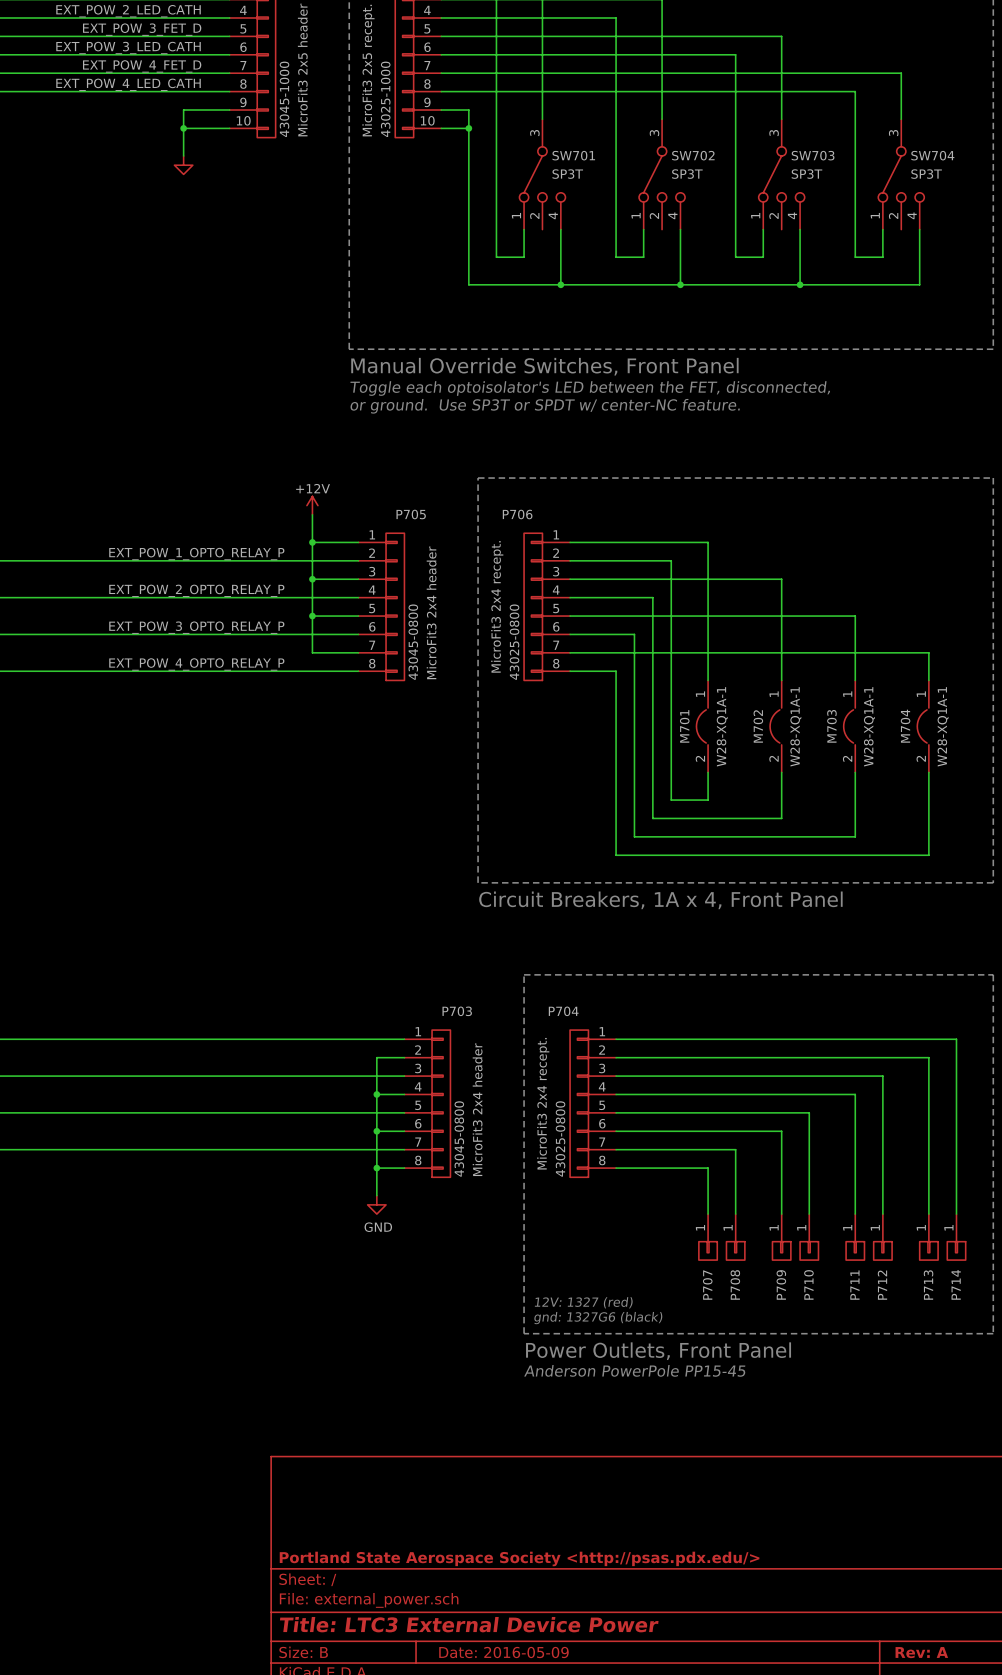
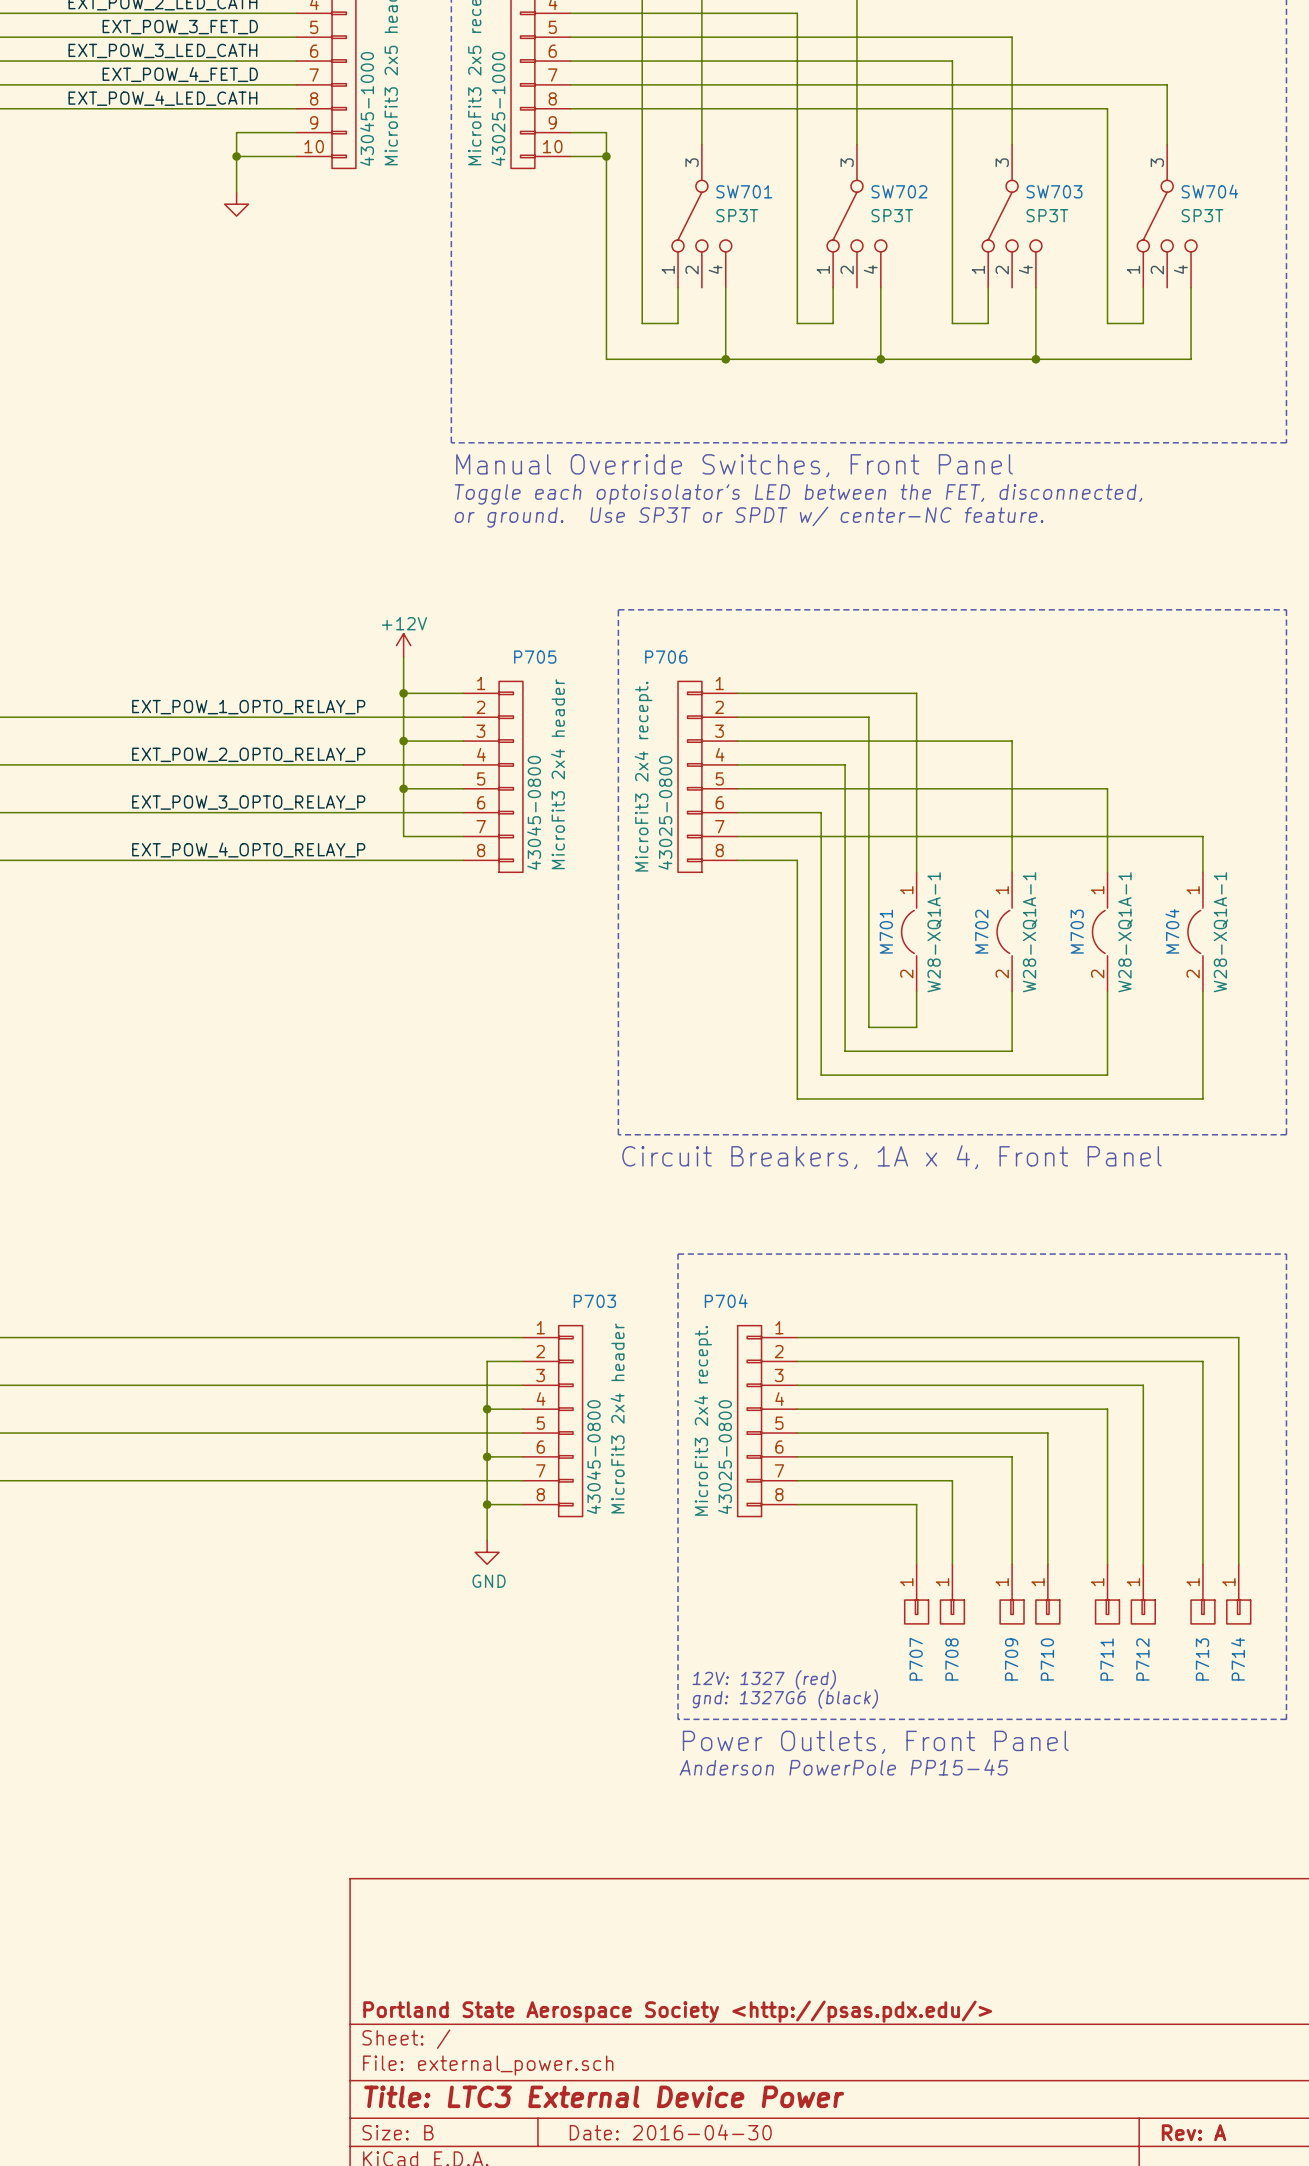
title block: Date: 2016-05-09 (503, 1652) -> Date: 2016-04-30 (670, 2132)

